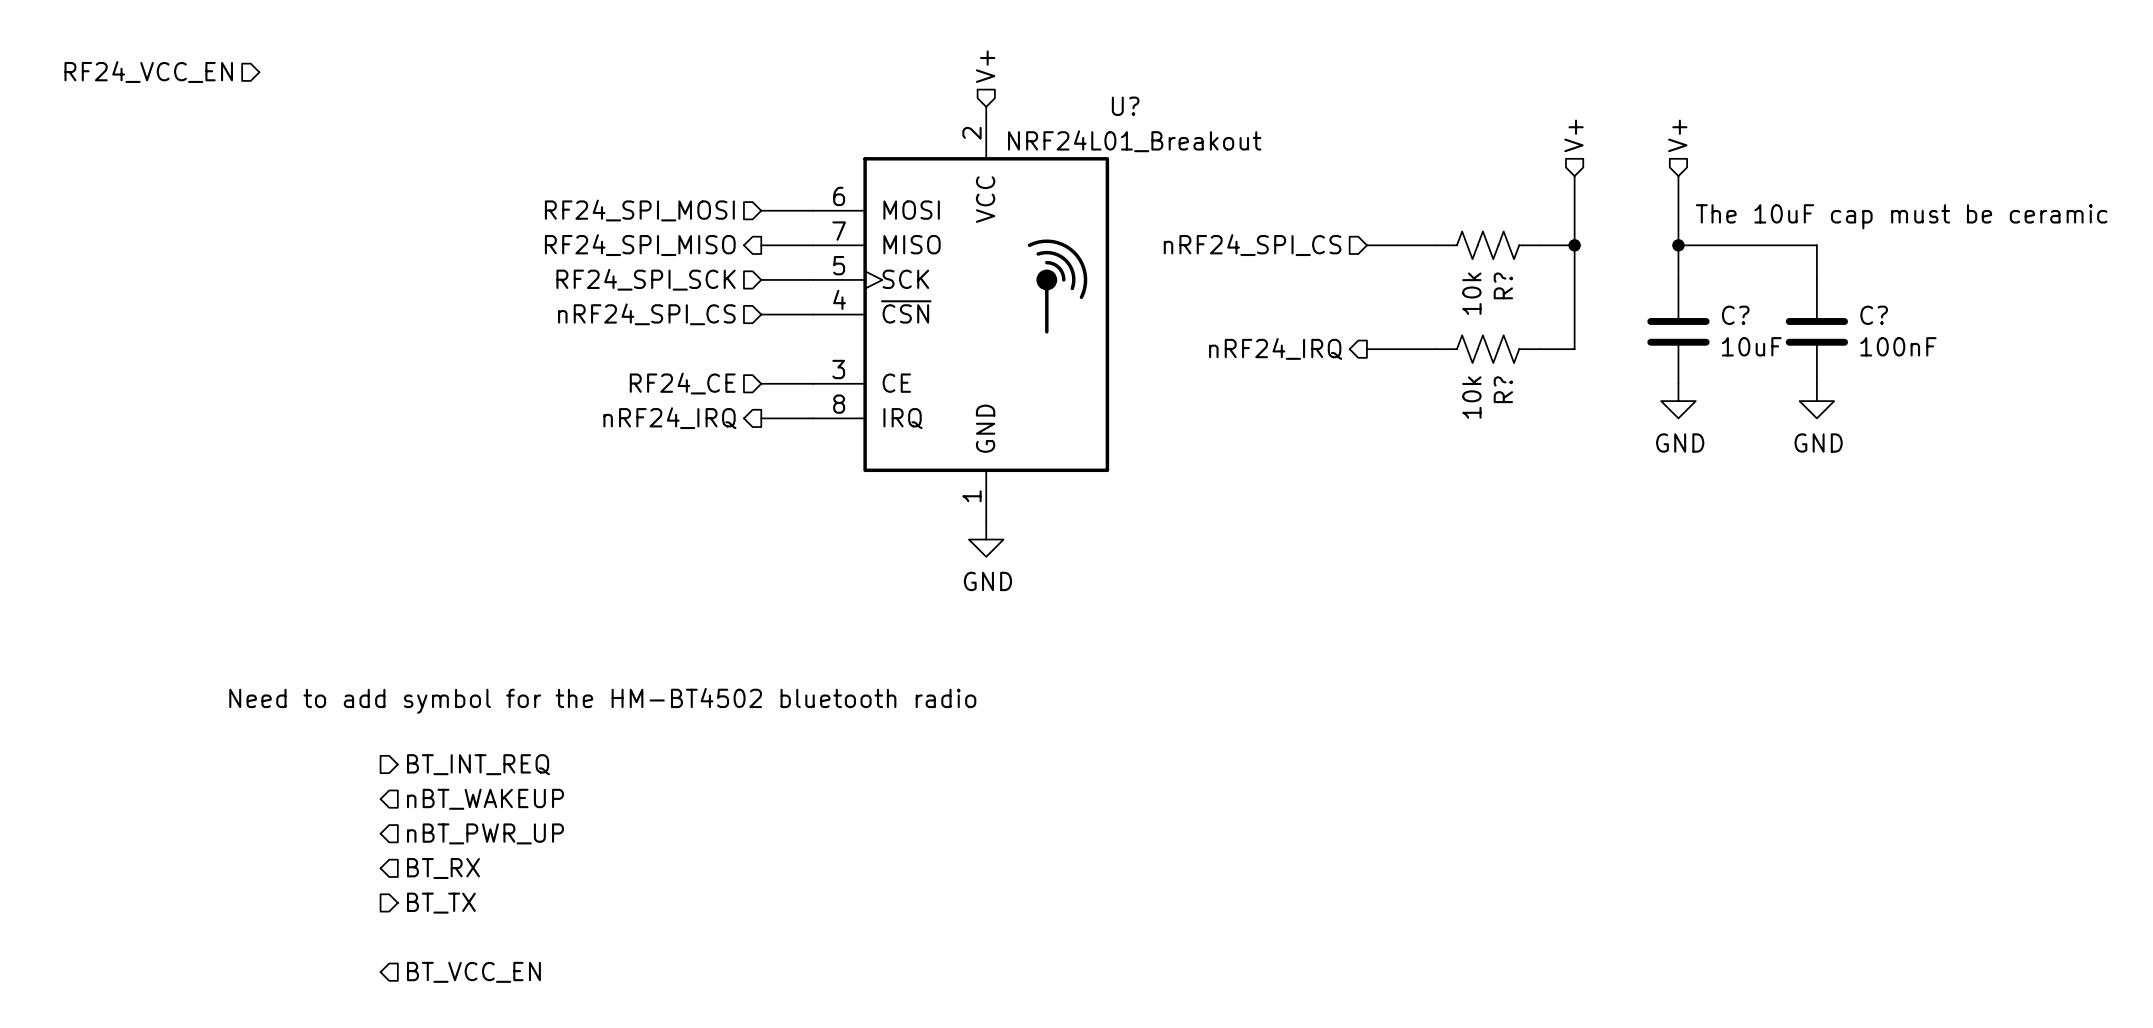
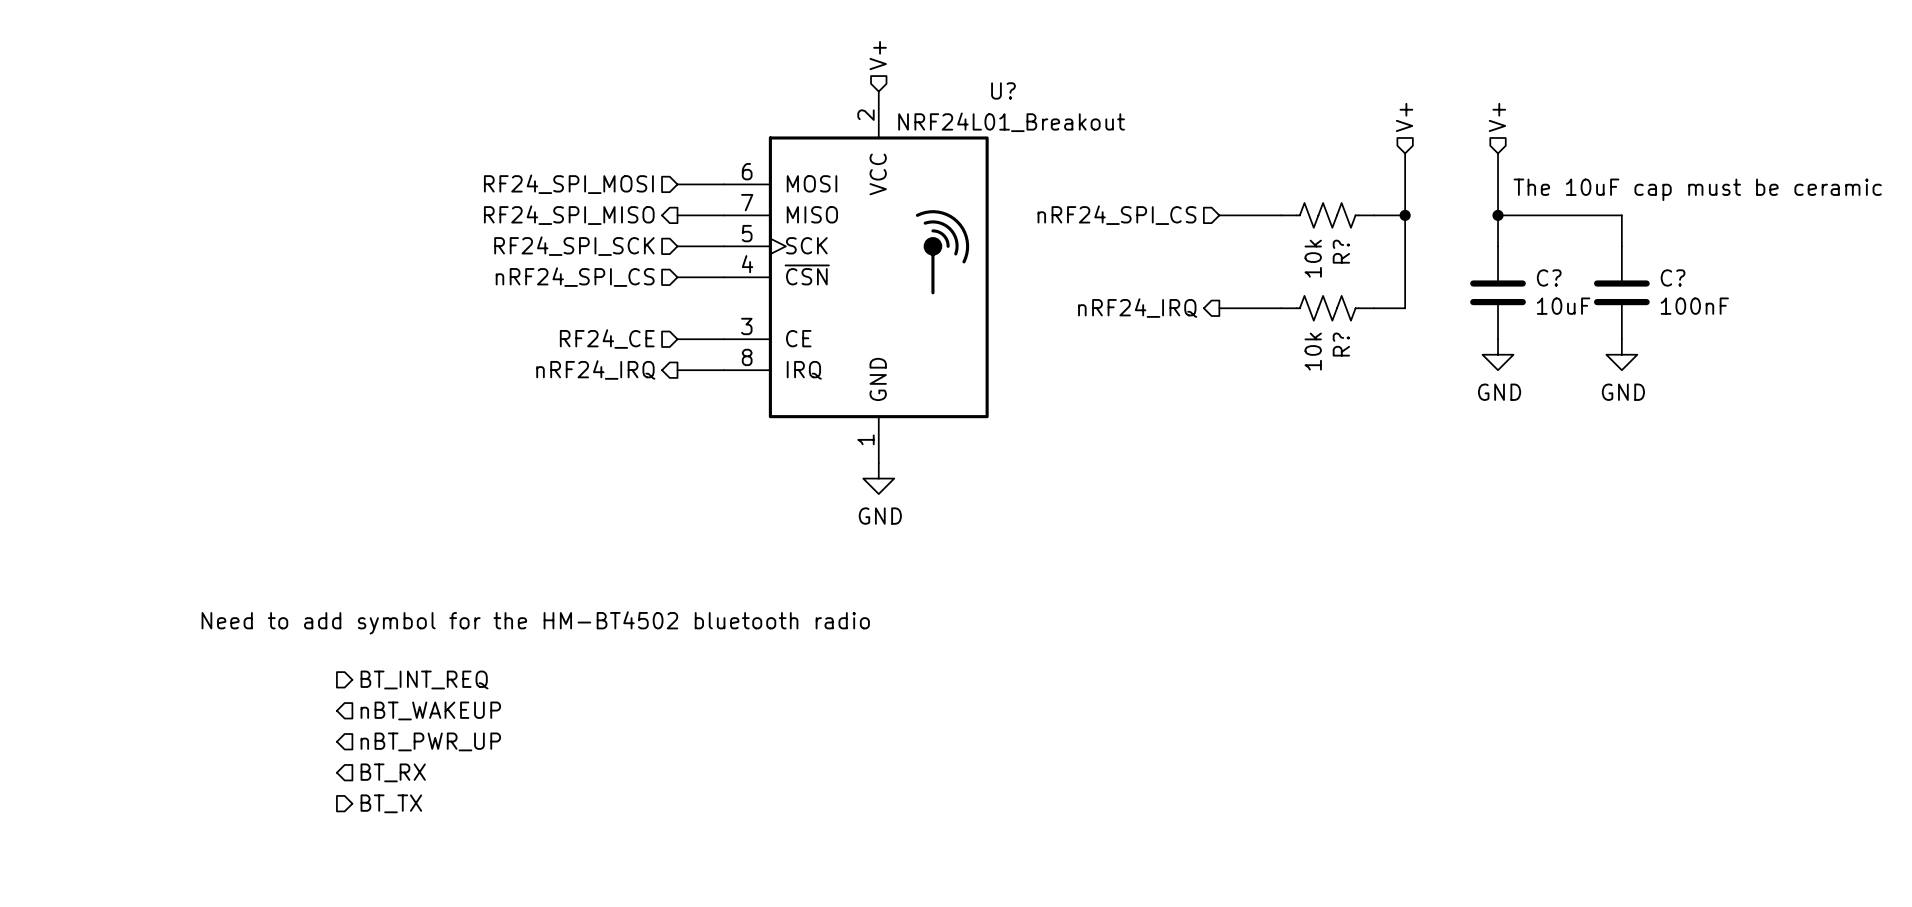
hierarchical label: RF24_VCC_EN (148, 72) -> none
hierarchical label: BT_VCC_EN (473, 972) -> none

